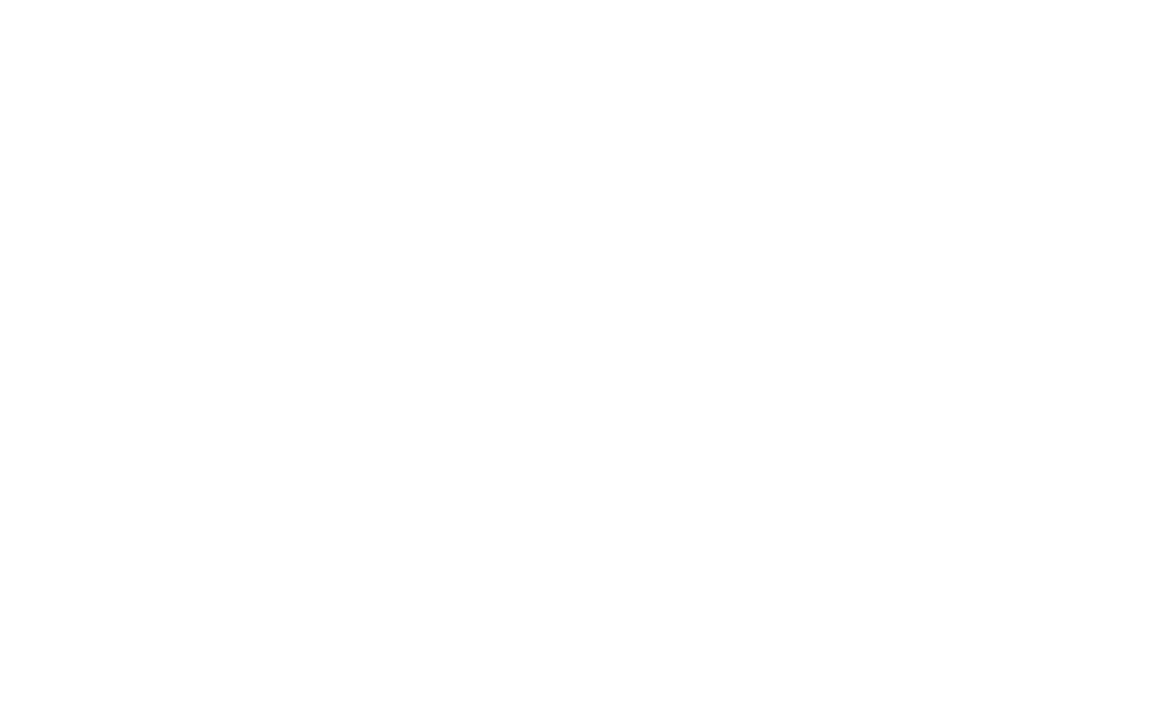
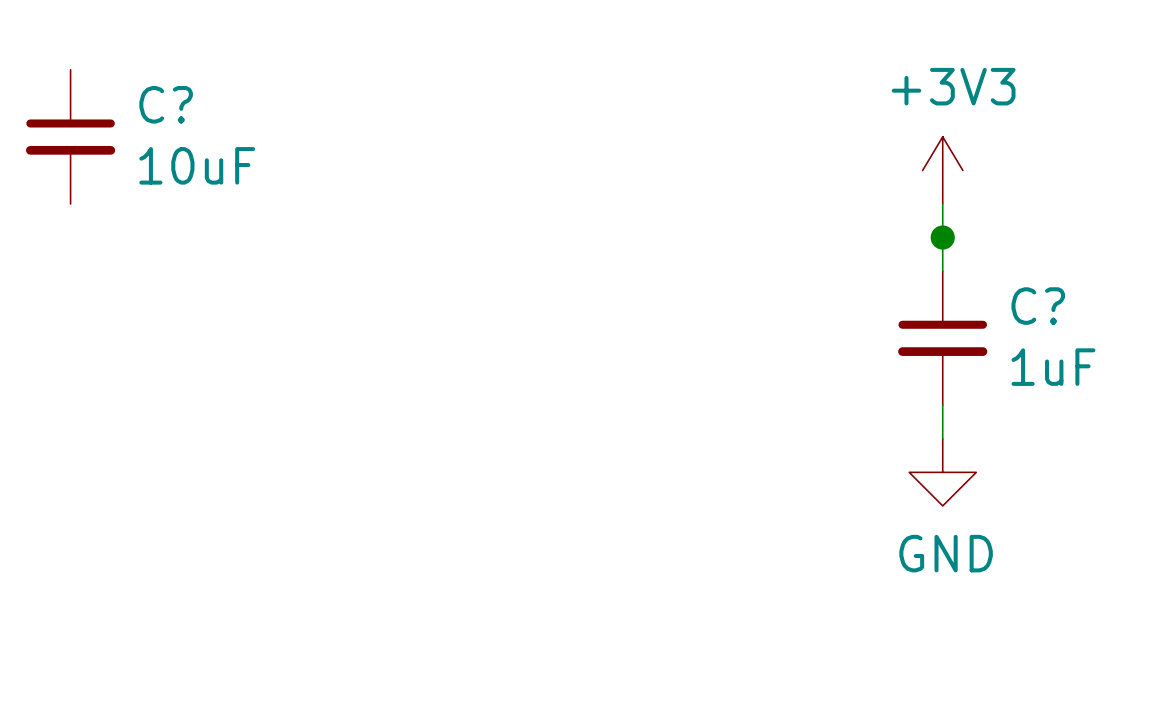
C?: none -> 10uF (70, 136)
power symbol: none -> +3V3 (942, 170)
wire: none -> (942, 203) (942, 271)
junction: none -> (942, 237)
C?: none -> 1uF (942, 338)
wire: none -> (942, 405) (942, 438)
power symbol: none -> GND (942, 472)

